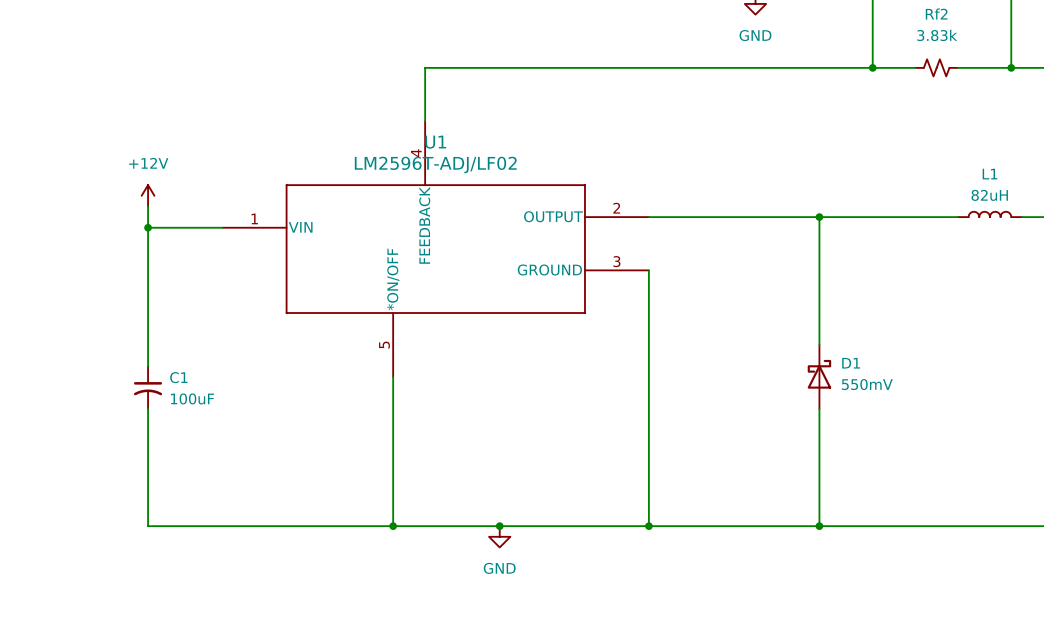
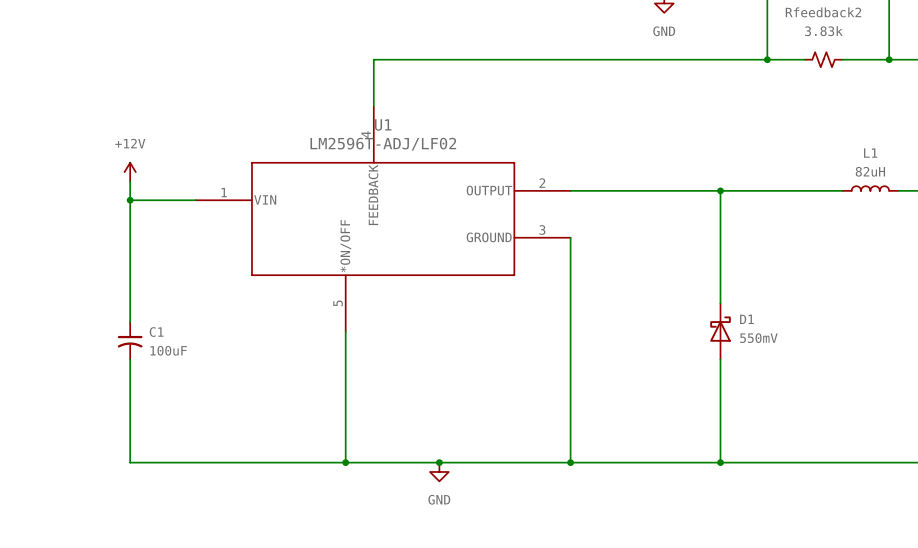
Rf2 name: Rf2 (936, 13) -> Rfeedback2 (823, 12)

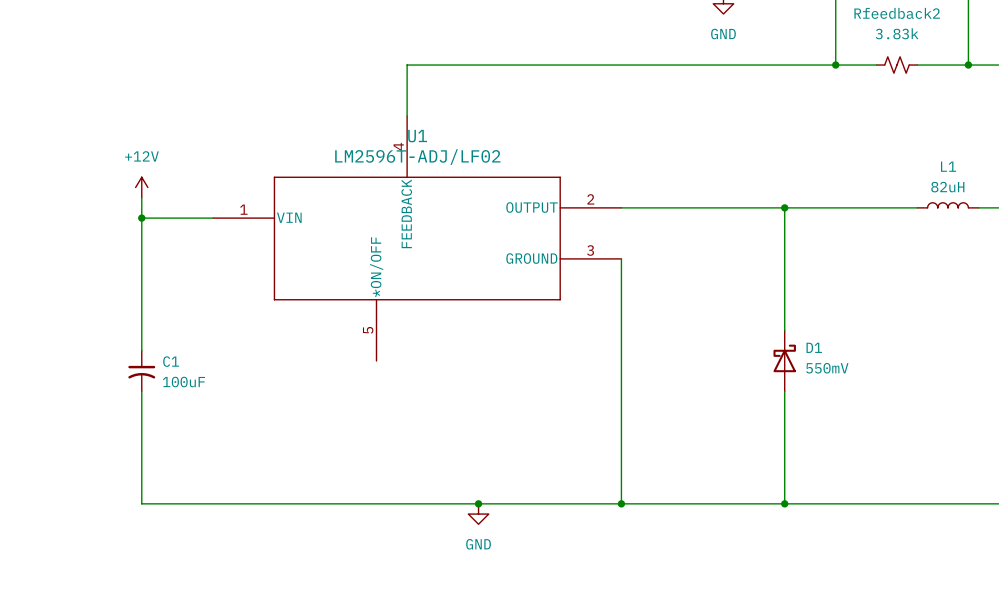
wire: (345, 331) (345, 462) -> none
junction: (345, 462) -> none

